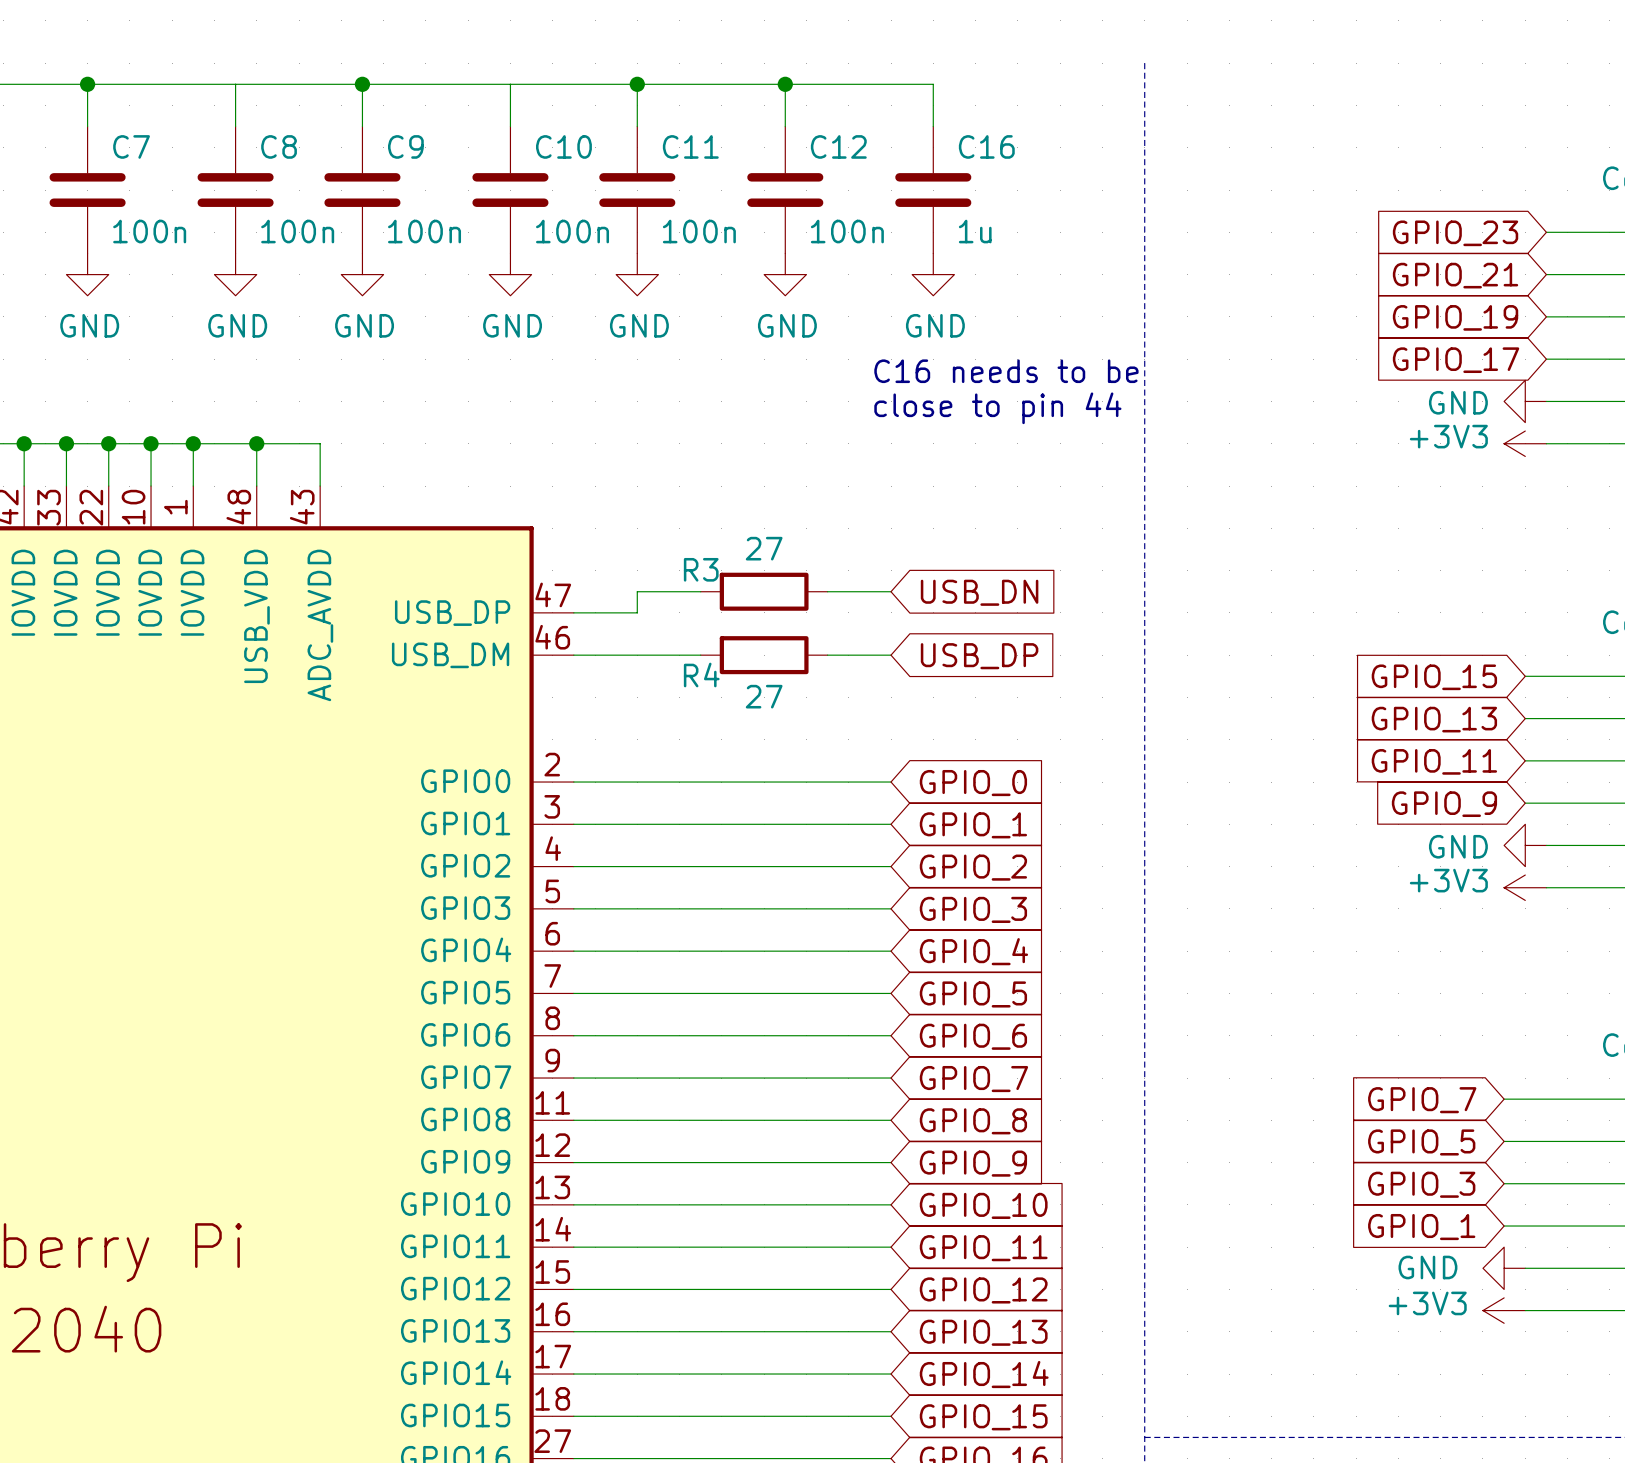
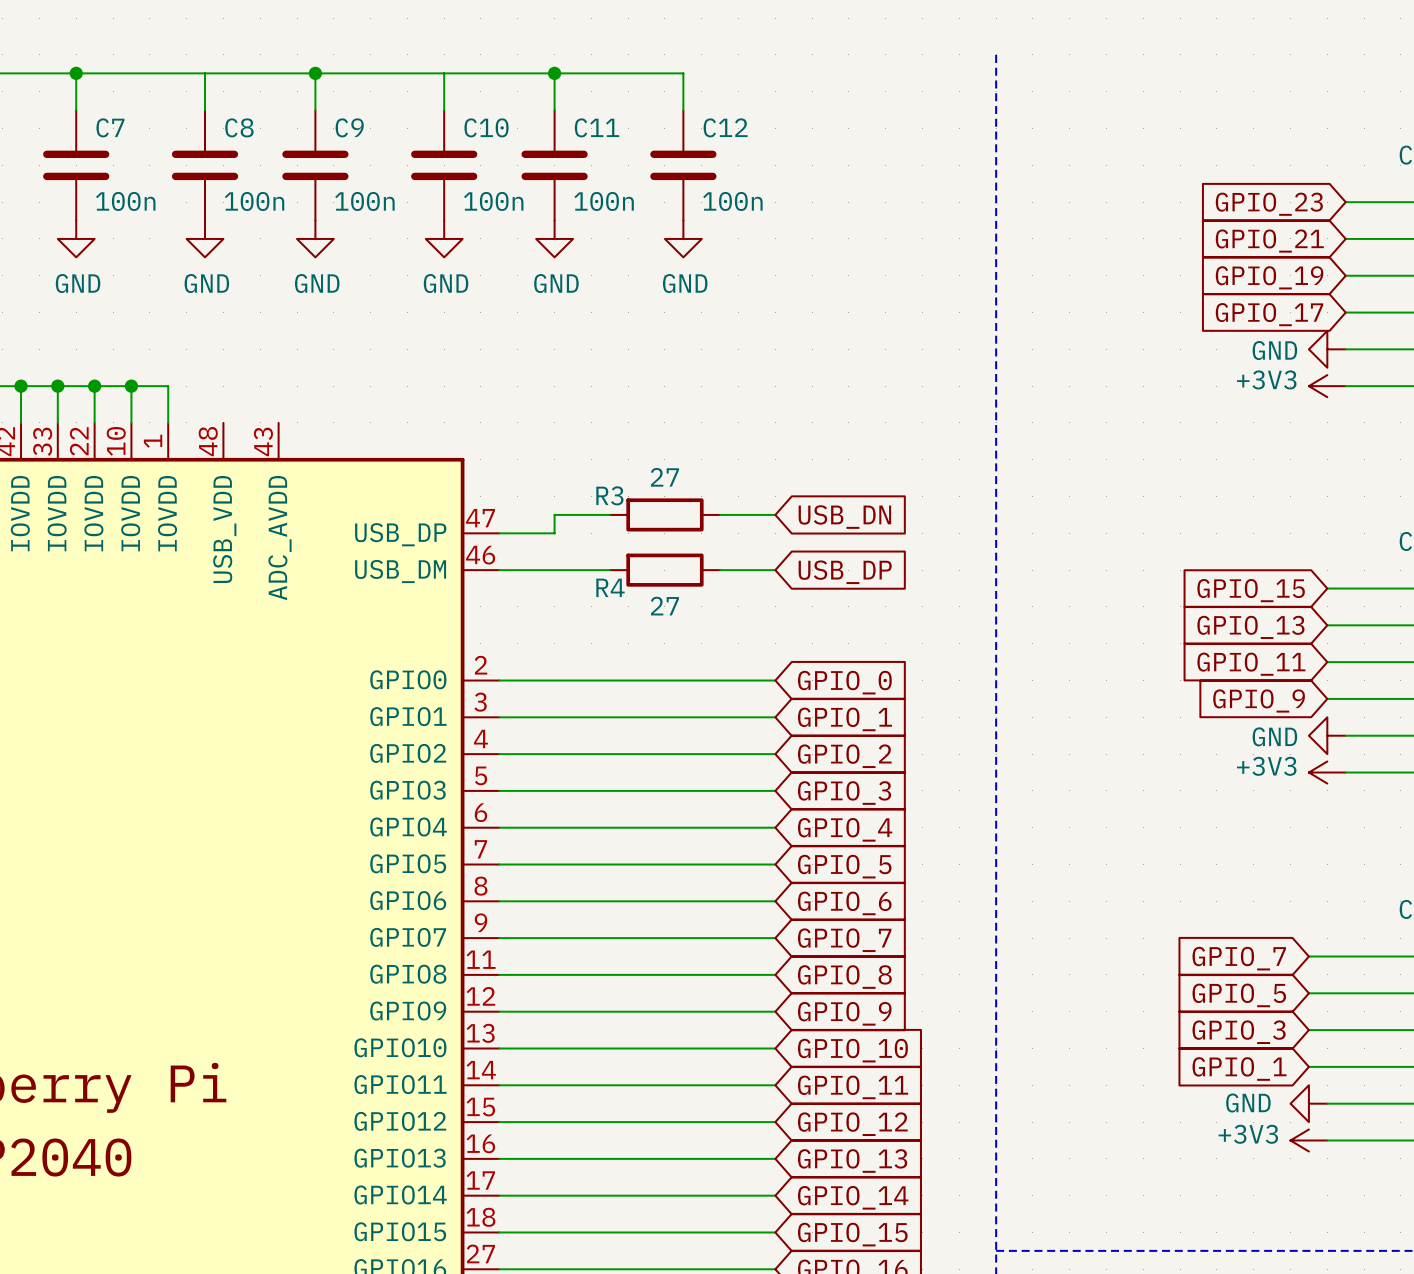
wire: (785, 84) (933, 84) (933, 126) -> none
junction: (785, 84) -> none
C16: 1u (933, 190) -> none
power symbol: GND (933, 274) -> none
text: C16 needs to be (1006, 371) -> none
text: close to pin 44 (997, 408) -> none
wire: (193, 443) (320, 443) (320, 486) -> none
junction: (193, 443) -> none
wire: (256, 443) (256, 486) -> none
junction: (256, 443) -> none

